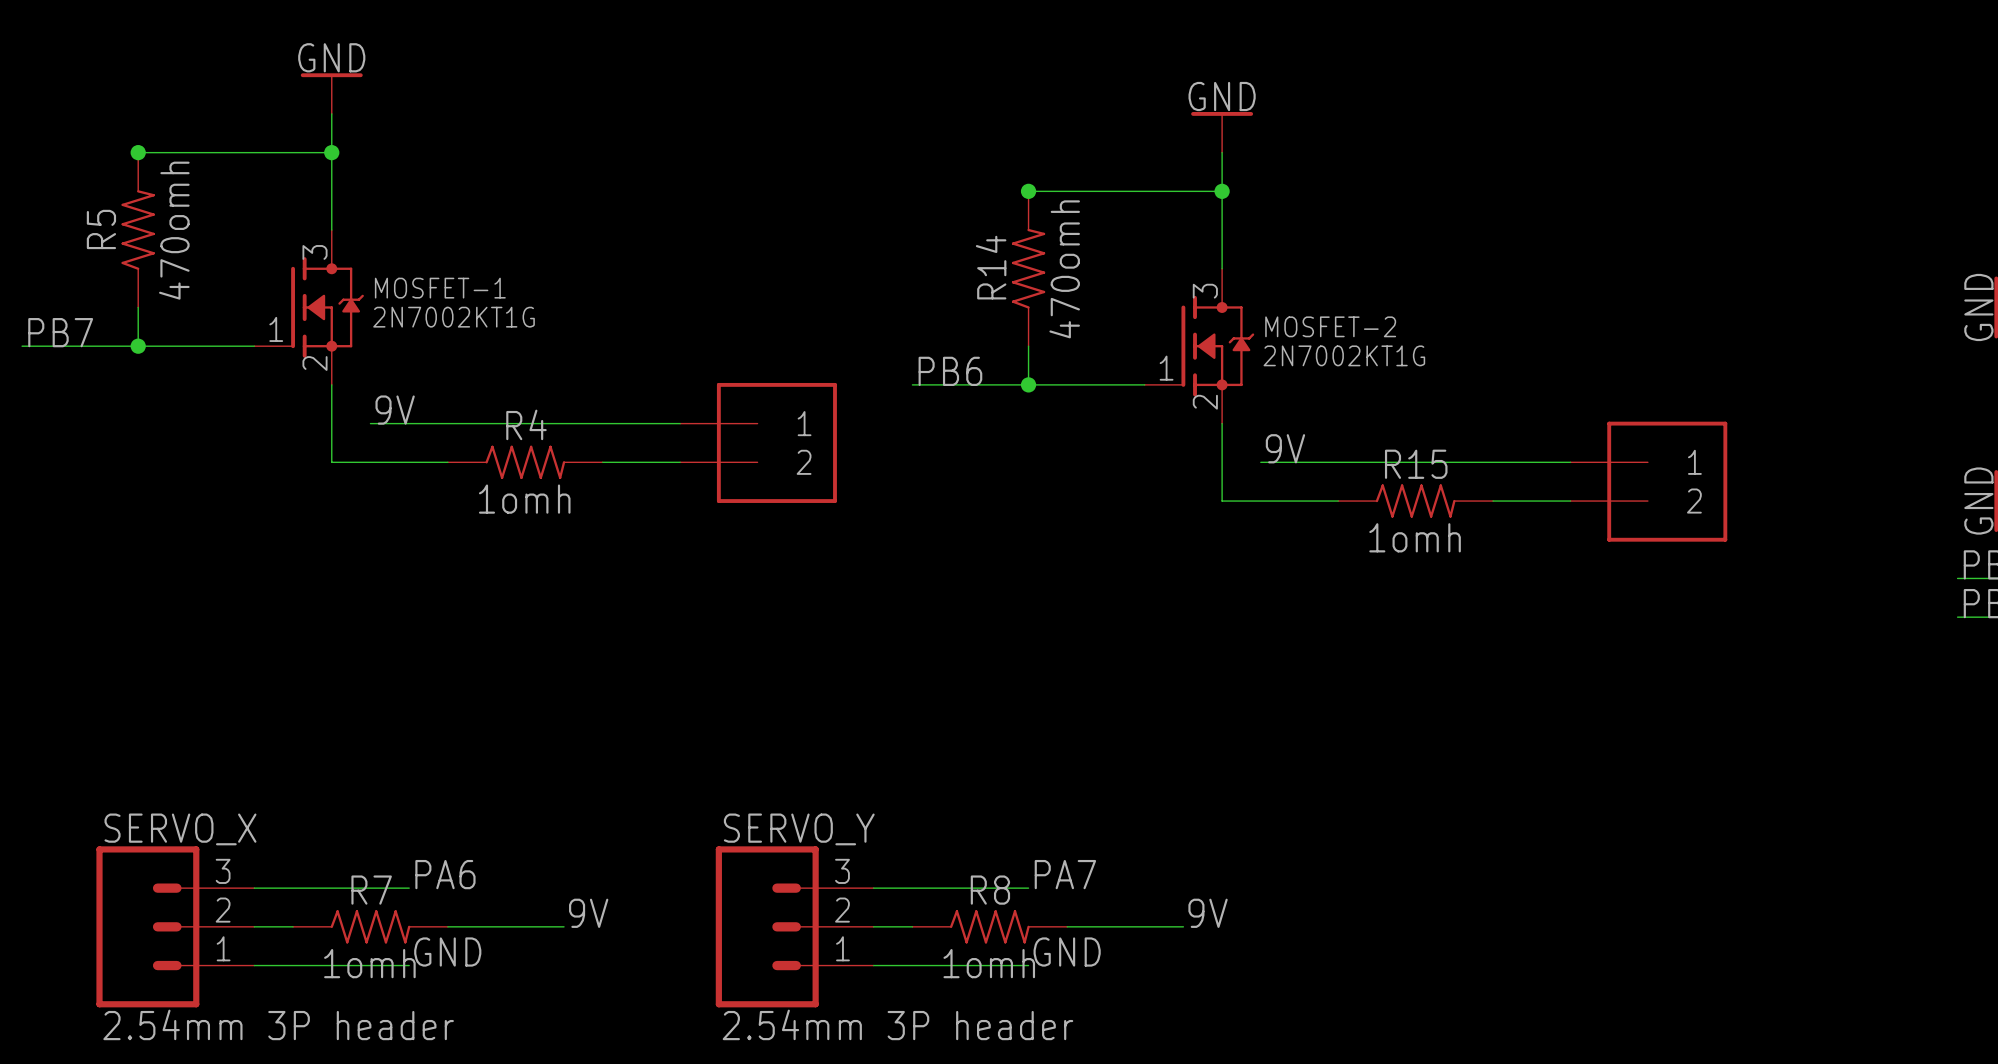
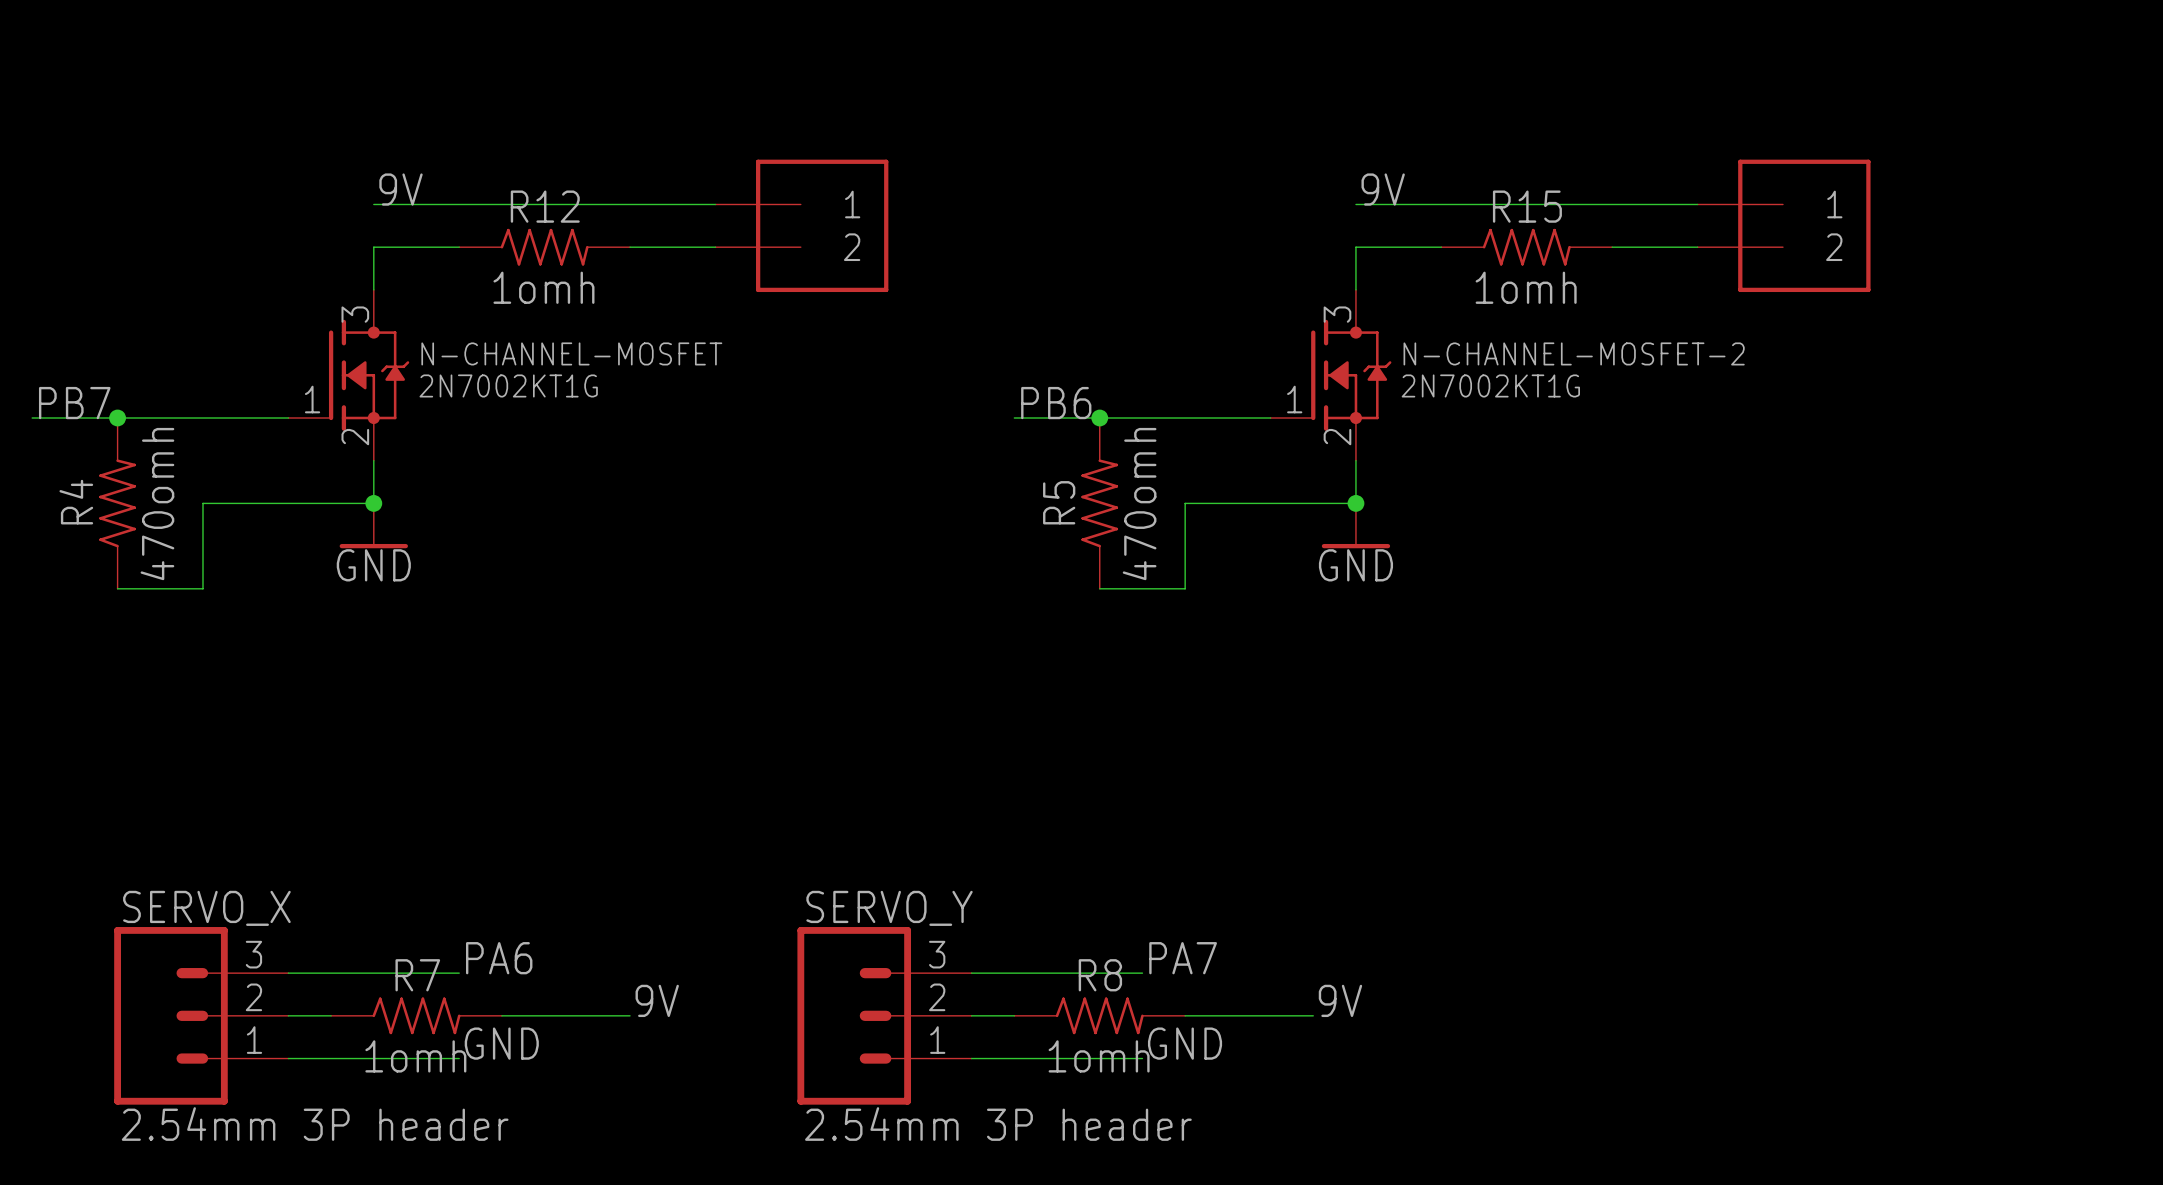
power symbol: GND (331, 93) -> none
wire: (331, 113) (331, 230) -> none
power symbol rotation: 0° (1222, 113) -> 180° (1355, 546)
power symbol position: GND (1222, 132) -> GND (1355, 525)
wire: (138, 152) (331, 152) -> none
junction: (138, 152) -> none
junction: (331, 152) -> none
wire: (1222, 152) (1222, 230) -> (1441, 247) (1355, 247)
wire: (1028, 191) (1222, 191) -> (1697, 204) (1355, 204)
junction: (1028, 191) -> none
junction: (1222, 191) -> none
R5 position: (138, 230) -> (1099, 503)
wire: none -> (459, 247) (373, 247) (373, 289)
R12: none -> 1omh (544, 247)
R14: 470omh (1028, 268) -> none
wire: (138, 307) (138, 346) -> none
MOSFET-1: 2N7002KT1G (309, 307) -> none
MOSFET-2 name: MOSFET-2 (1330, 326) -> N-CHANNEL-MOSFET-2 (1574, 353)
label position: PB7 (60, 332) -> PB7 (74, 403)
wire: (22, 346) (254, 346) -> (32, 418) (288, 418)
junction position: (138, 346) -> (117, 418)
N-CHANNEL-MOSFET: none -> 2N7002KT1G (348, 375)
wire: (1028, 346) (1028, 384) -> none
junction position: (1028, 384) -> (1099, 418)
label position: 9V (395, 410) -> 9V (401, 189)
wire: (370, 423) (680, 423) -> (373, 204) (715, 204)
part position: (758, 442) -> (801, 225)
label position: 9V (1285, 448) -> 9V (1383, 189)
wire: (331, 462) (447, 462) -> (373, 503) (202, 503) (202, 588) (117, 588)
junction: none -> (373, 503)
R4 rotation: 0° (525, 462) -> 90° counterclockwise (117, 503)
R4 position: (525, 462) -> (117, 503)
wire: (602, 462) (680, 462) -> (630, 247) (715, 247)
wire: (1222, 462) (1222, 501) (1338, 501) -> (1355, 503) (1185, 503) (1185, 588) (1099, 588)
junction: none -> (1355, 503)
wire: (1260, 462) (1570, 462) -> none
part position: (1648, 481) -> (1784, 225)
power symbol: none -> GND (373, 525)
R4 value: 1omh (524, 499) -> 470omh (157, 504)
R15 position: (1415, 501) -> (1526, 247)
wire: (1493, 501) (1570, 501) -> (1612, 247) (1697, 247)

